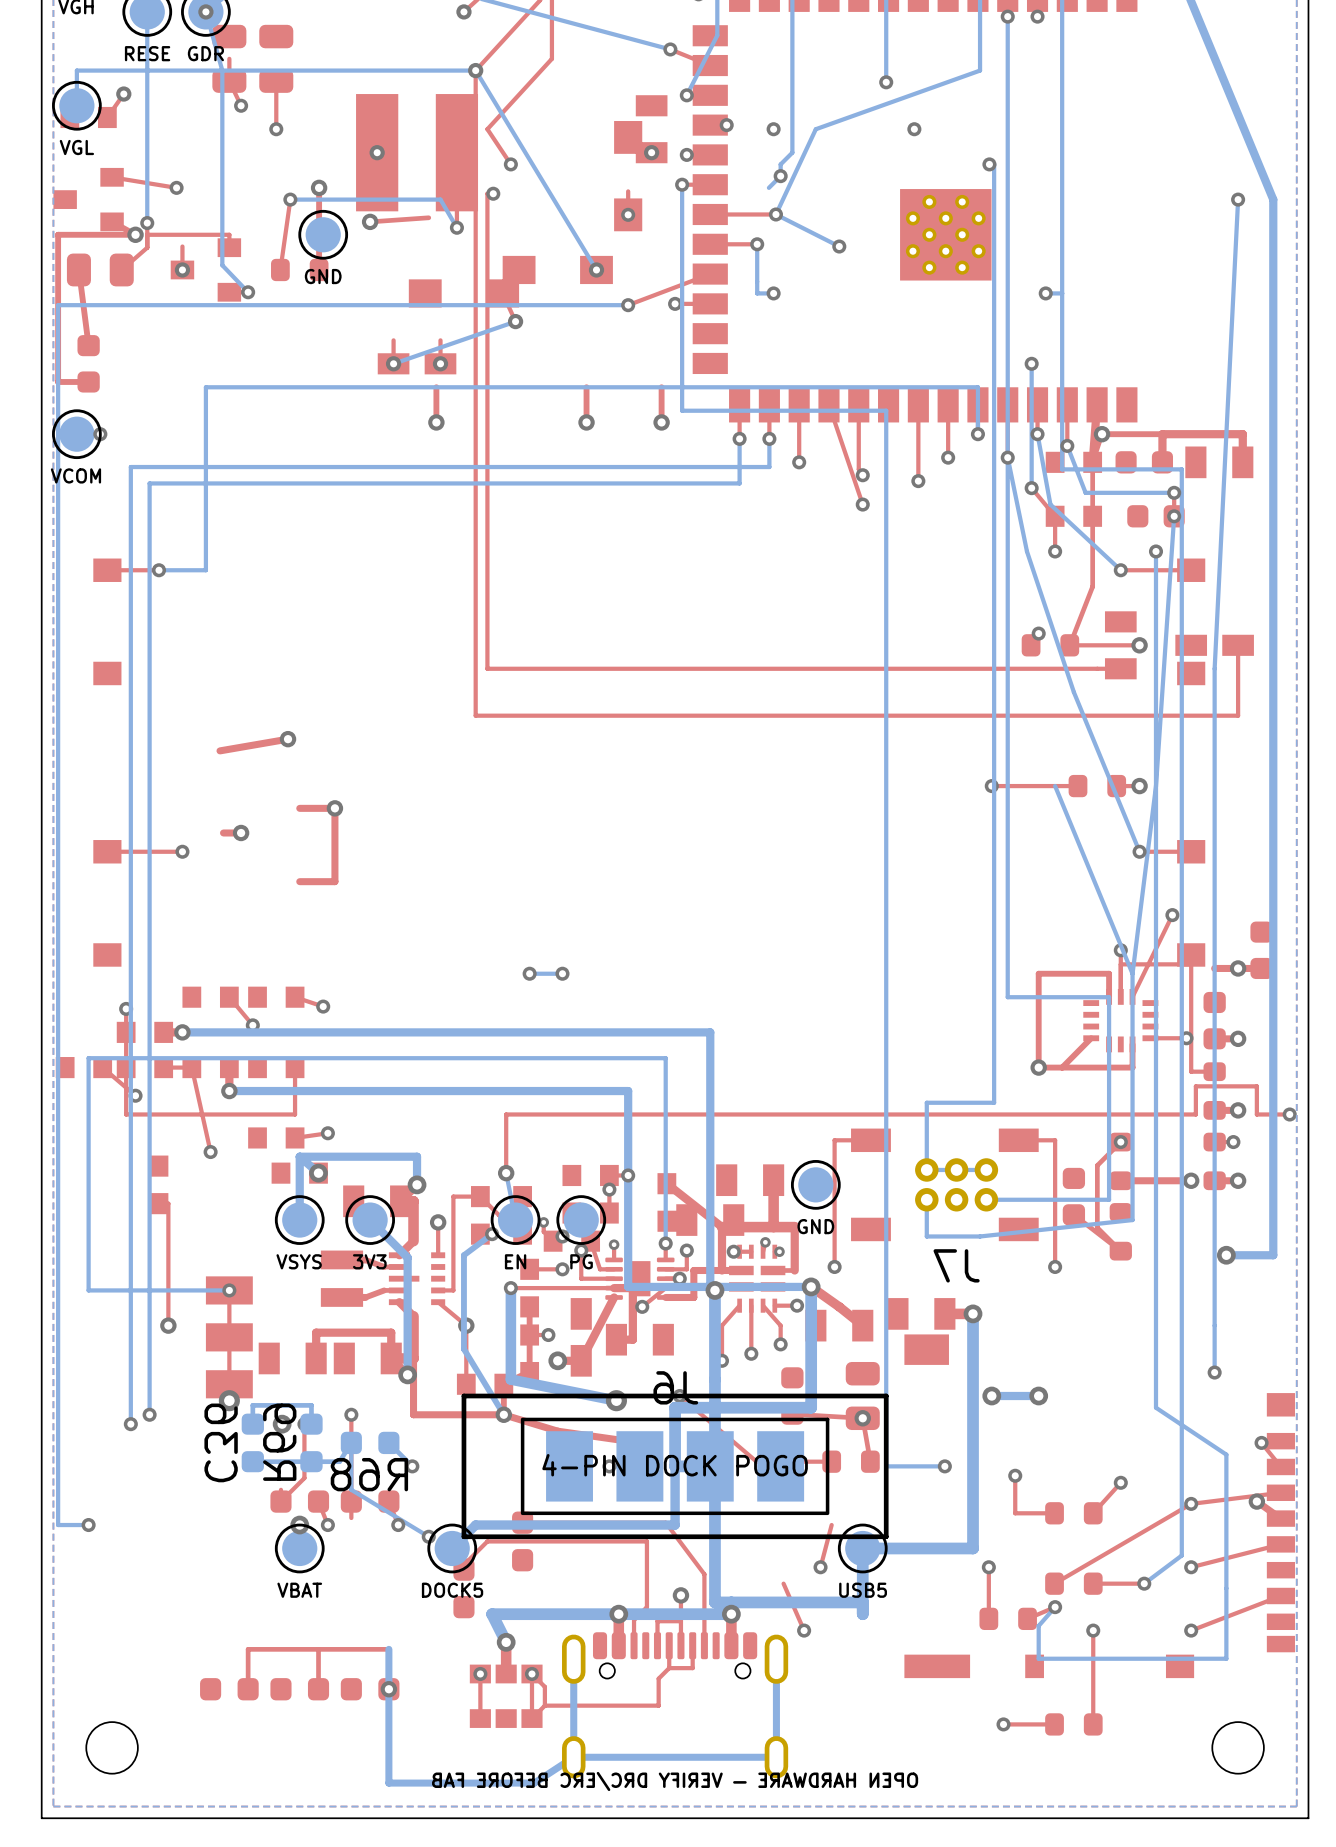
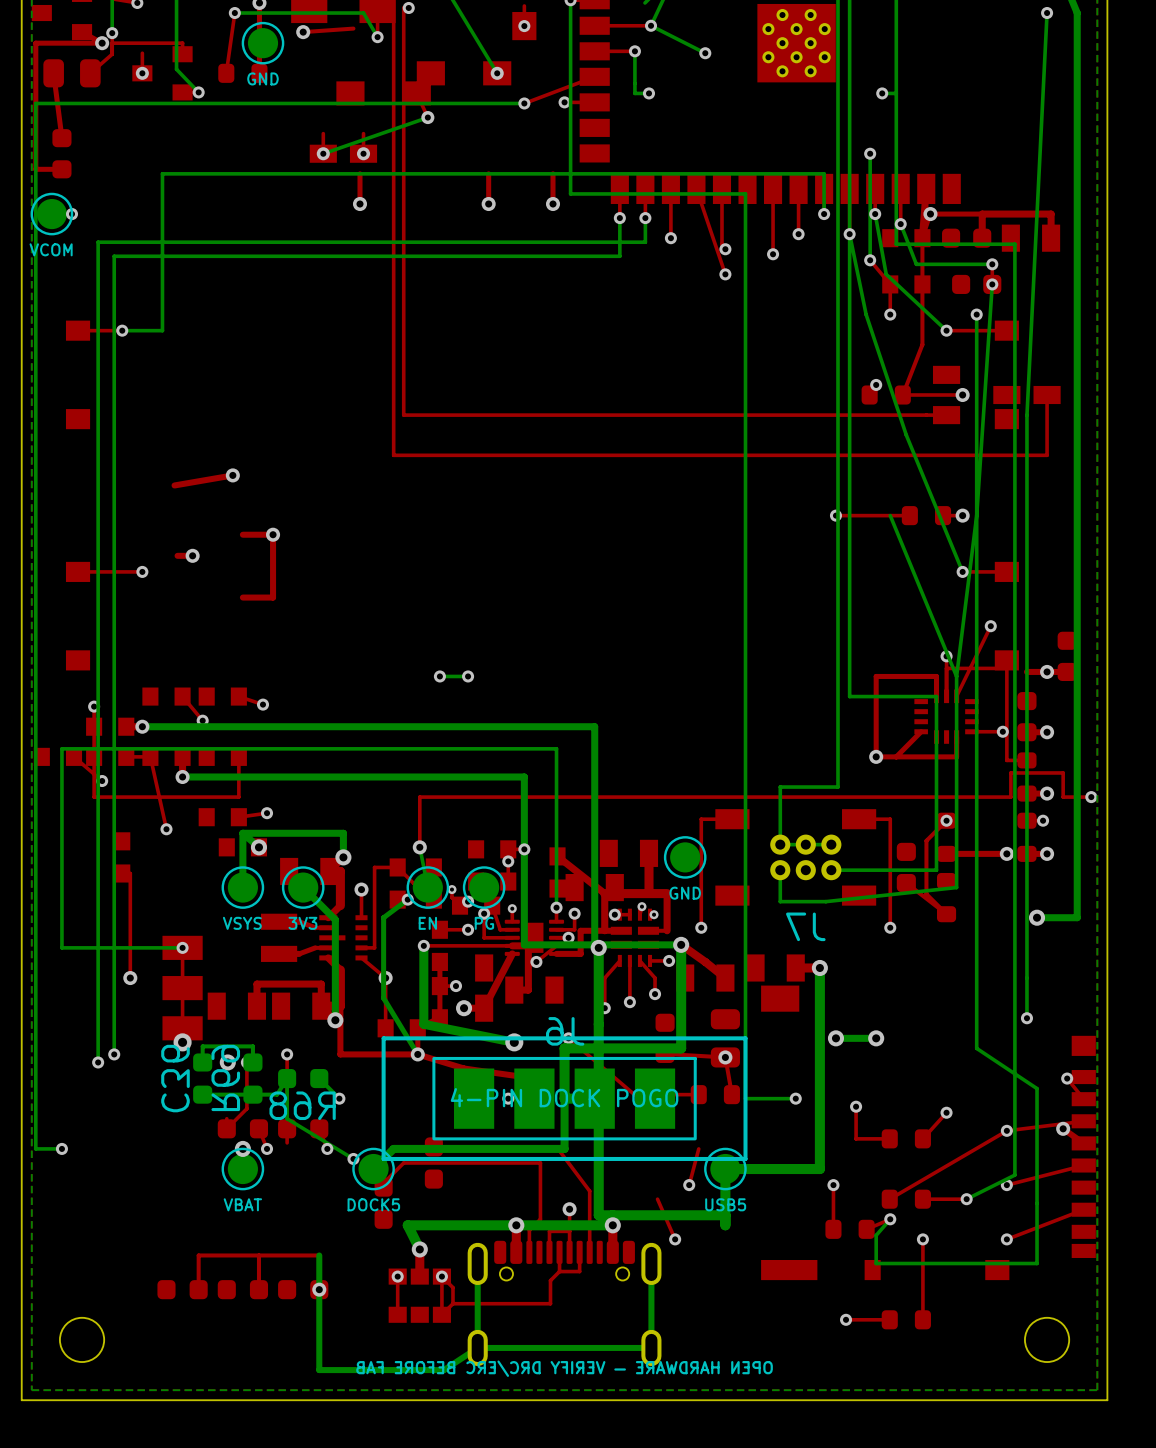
bottom track: (1181, 469) (1181, 1555) (1144, 1583) -> (998, 244) (1014, 244) (1014, 1175) (966, 1199)

